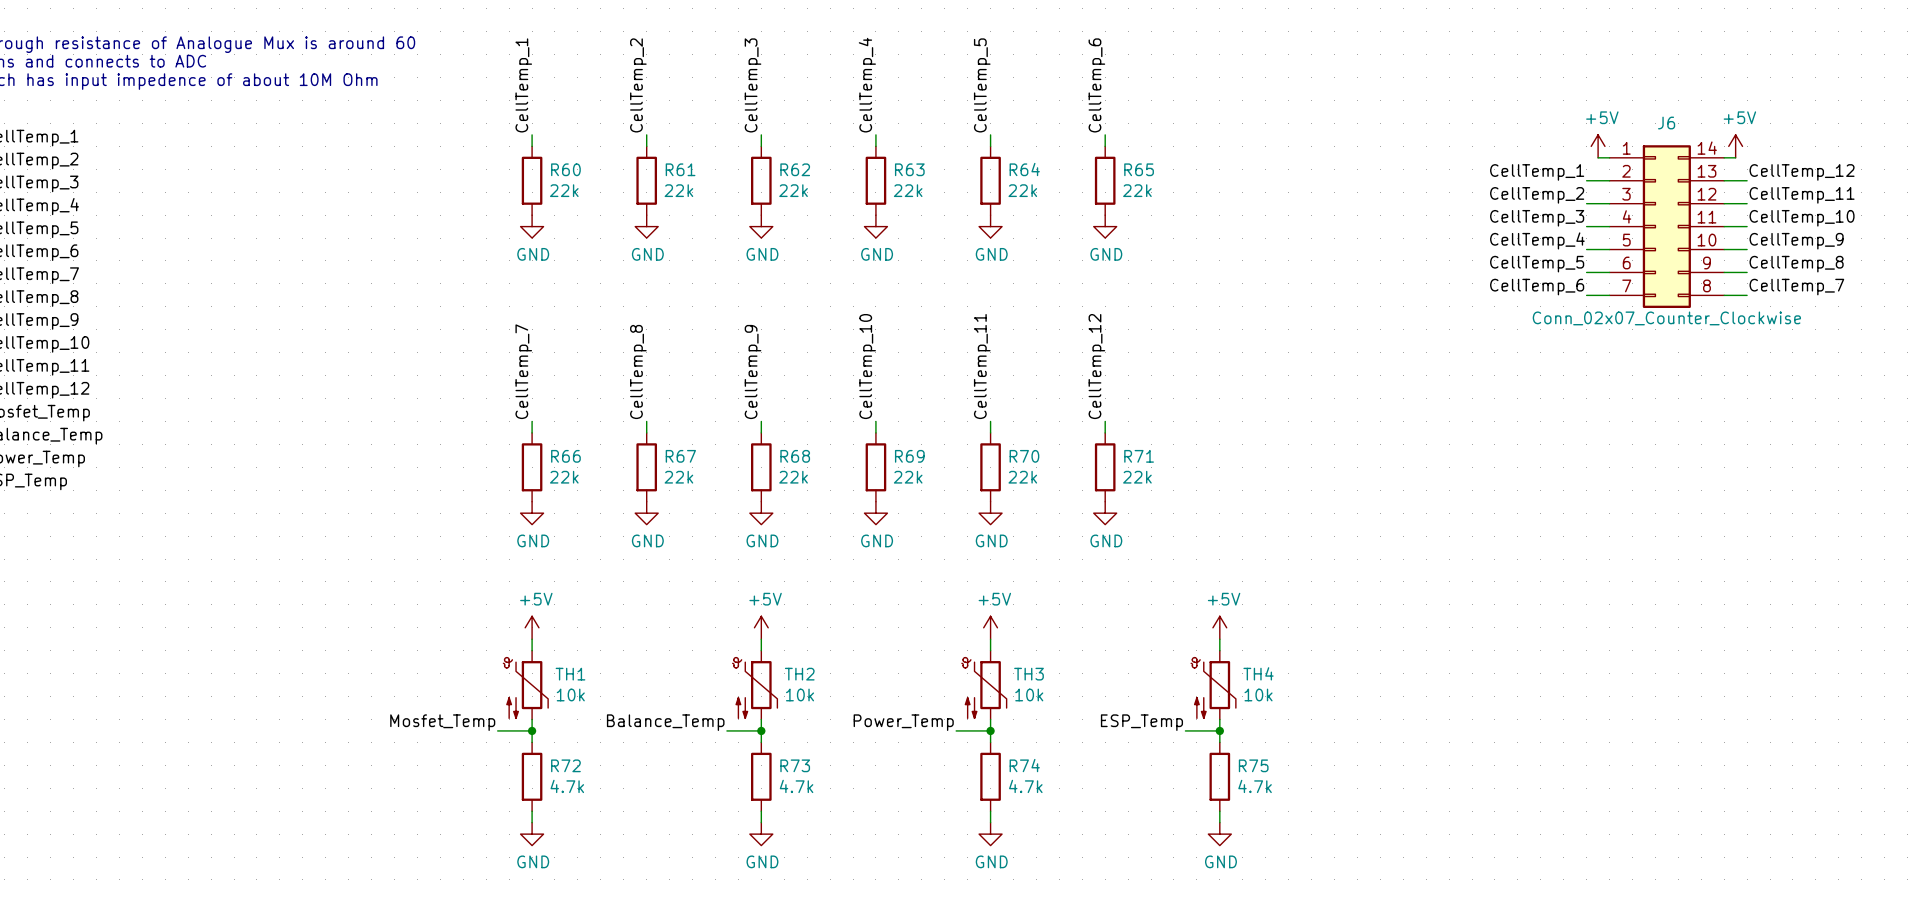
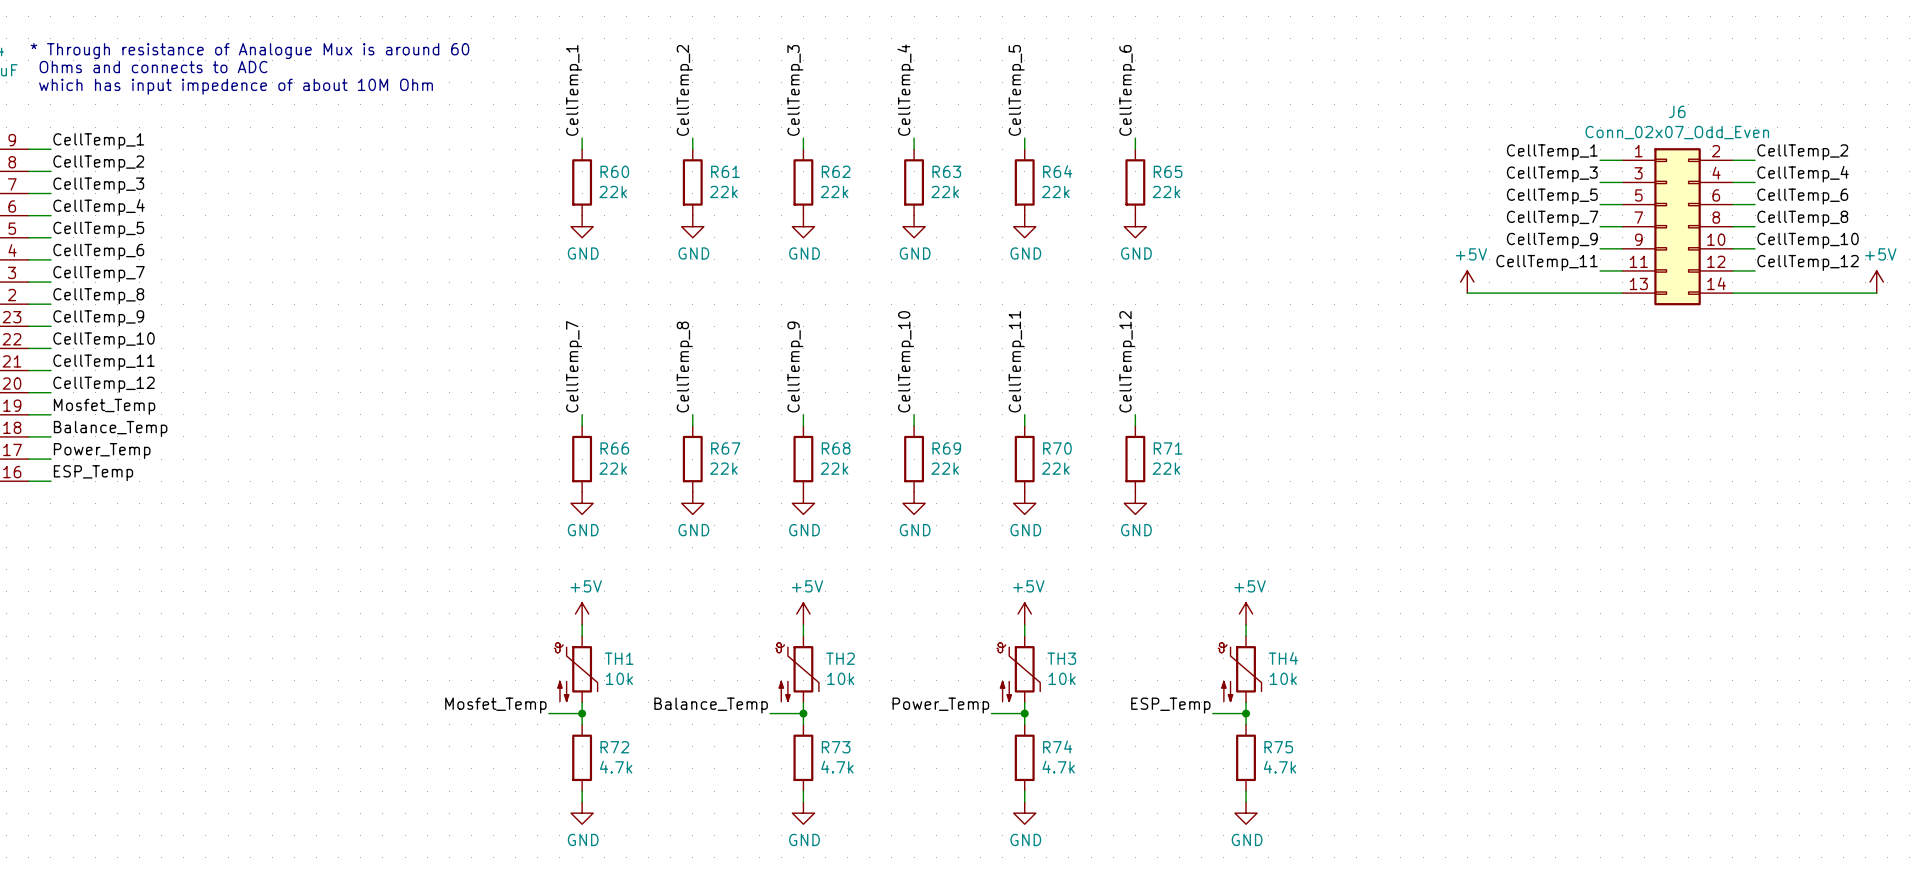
J6 symbol: [1609, 145, 1725, 308] -> [1622, 148, 1733, 306]
power symbol: +5V (1598, 146) -> none
power symbol: +5V (1735, 146) -> none
label: none -> CellTemp_1 (1552, 152)
label: none -> CellTemp_2 (1802, 152)
wire: none -> (1600, 160) (1611, 160)
wire: none -> (1743, 160) (1755, 160)
label: CellTemp_1 (1537, 172) -> CellTemp_3 (1552, 174)
label: CellTemp_12 (1802, 172) -> CellTemp_4 (1803, 174)
label: CellTemp_2 (1537, 195) -> CellTemp_5 (1552, 196)
label: CellTemp_11 (1802, 195) -> CellTemp_6 (1802, 196)
label: CellTemp_3 (1537, 218) -> CellTemp_7 (1552, 218)
label: CellTemp_10 (1802, 218) -> CellTemp_8 (1802, 218)
label: CellTemp_4 (1537, 240) -> CellTemp_9 (1552, 240)
label: CellTemp_9 (1796, 241) -> CellTemp_10 (1808, 240)
label: CellTemp_5 (1537, 264) -> CellTemp_11 (1547, 262)
label: CellTemp_8 (1796, 264) -> CellTemp_12 (1808, 262)
power symbol: none -> +5V (1467, 282)
power symbol: none -> +5V (1876, 282)
label: CellTemp_6 (1537, 287) -> none
label: CellTemp_7 (1796, 287) -> none
wire: none -> (1467, 293) (1600, 293)
wire: none -> (1755, 293) (1876, 293)
J6 value: Conn_02x07_Counter_Clockwise (1666, 318) -> Conn_02x07_Odd_Even (1677, 132)

